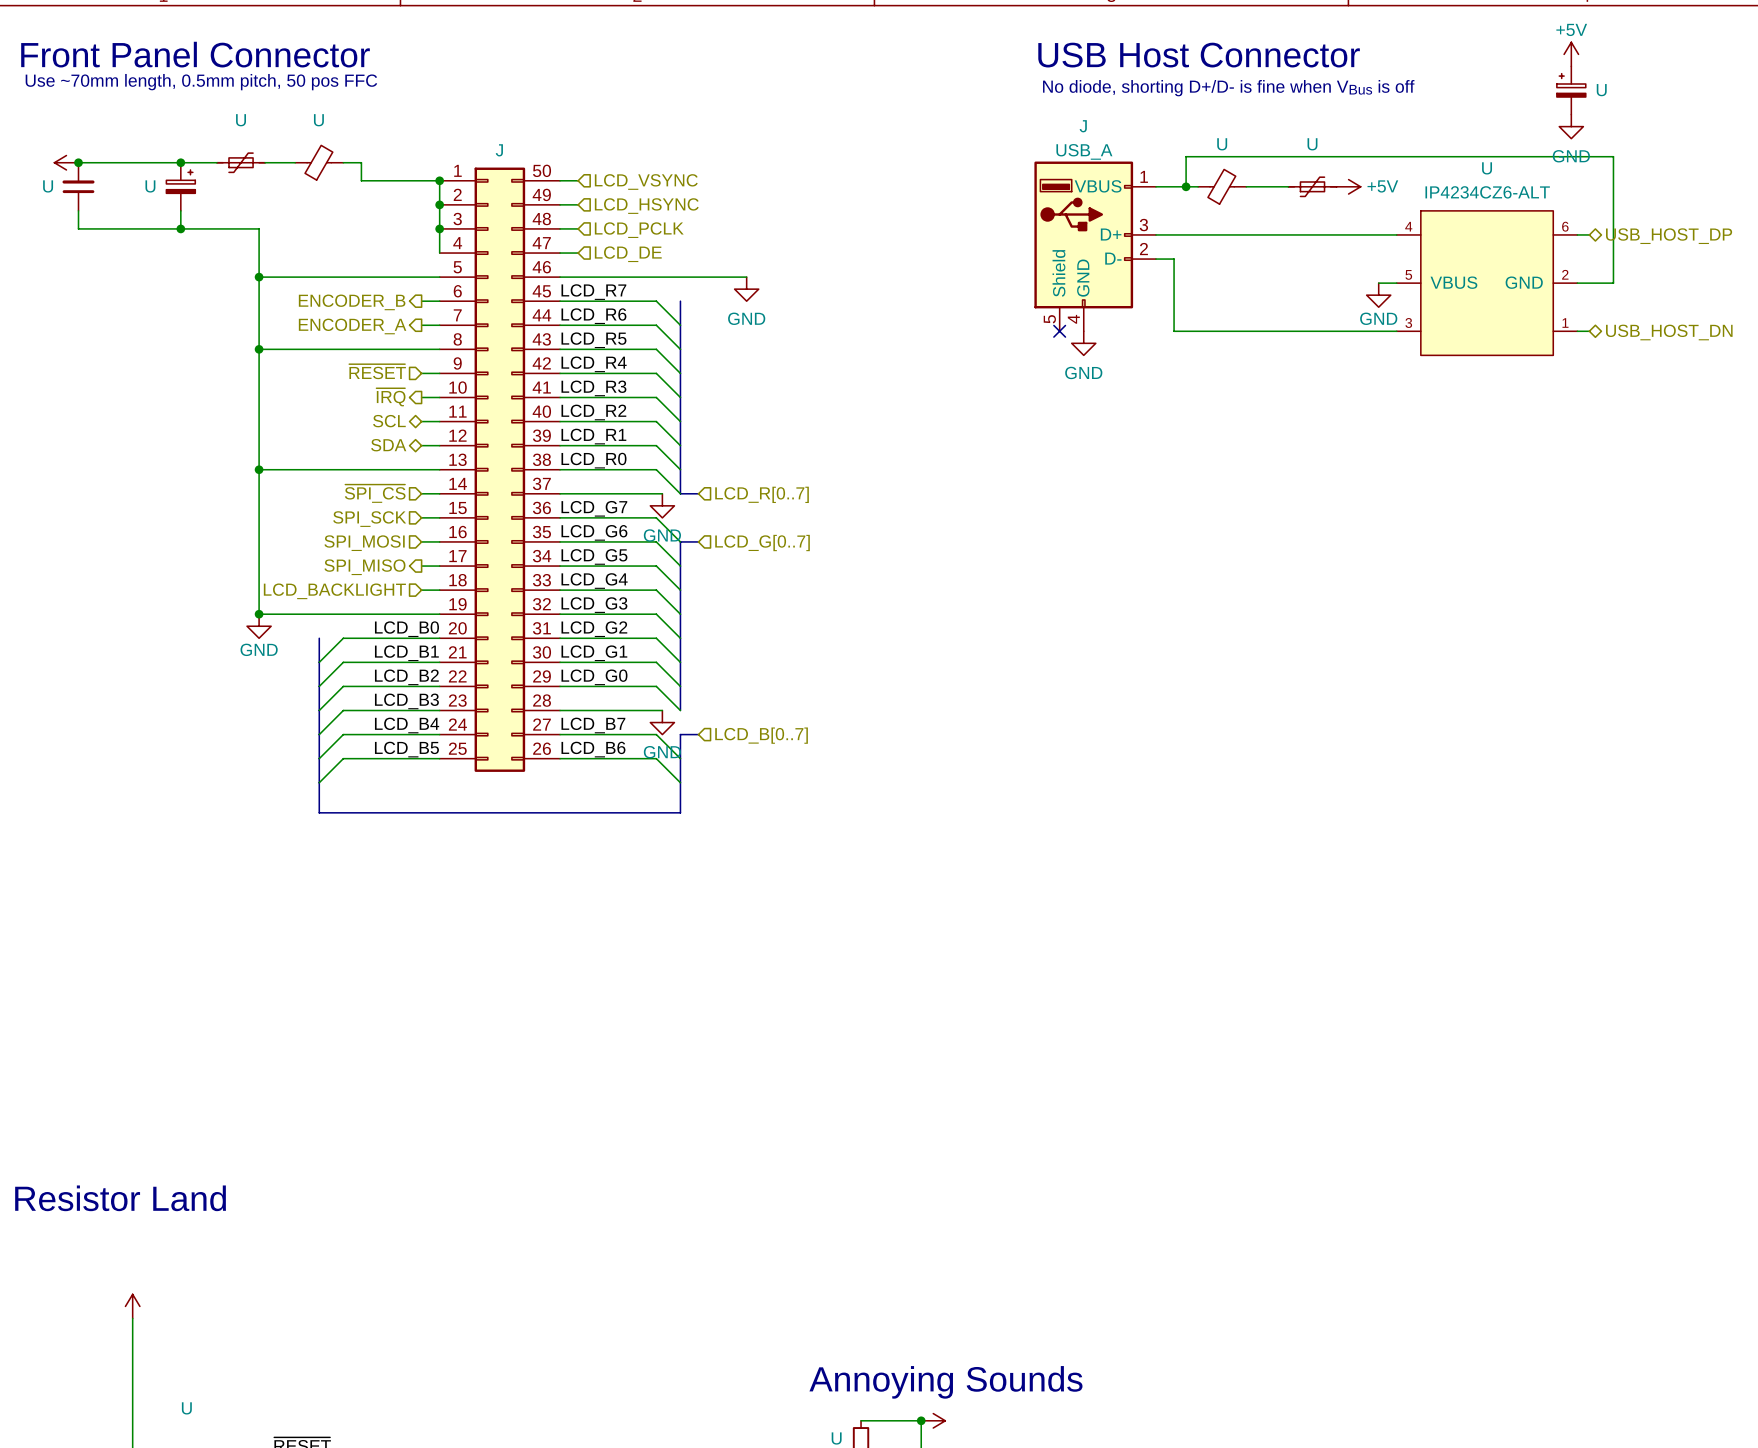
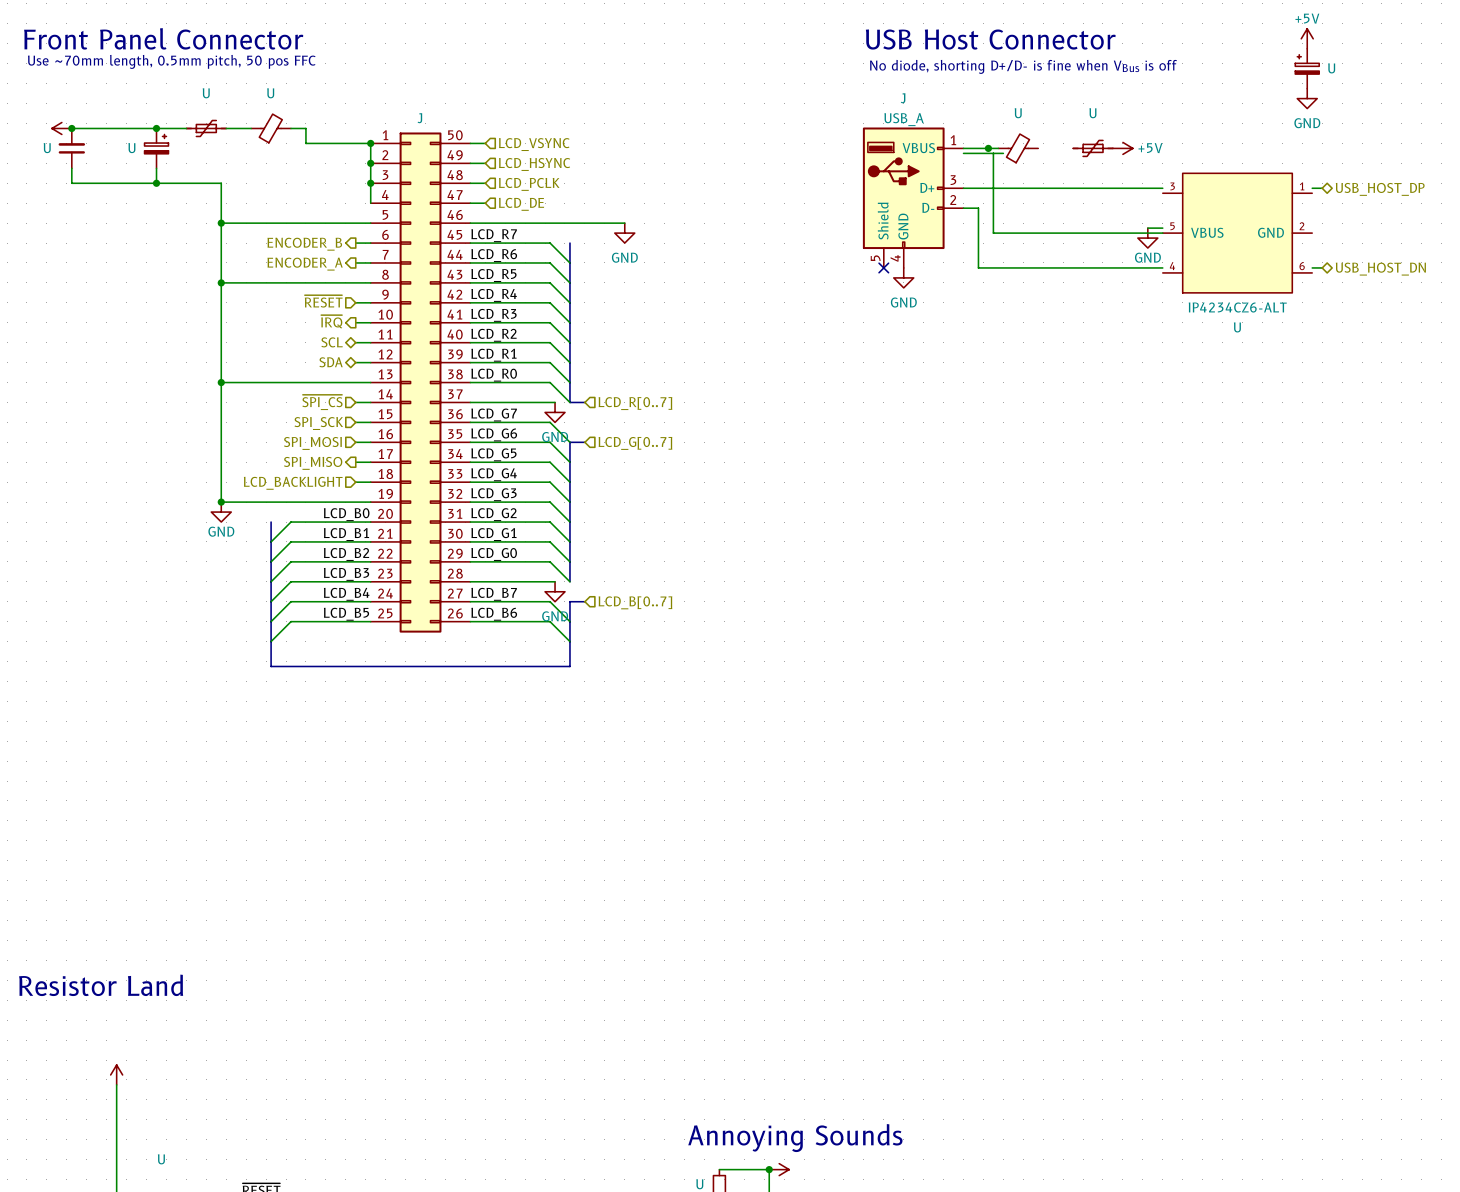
wire: (1186, 186) (1186, 156) (1613, 156) (1613, 283) (1577, 283) -> none
wire: (1246, 186) (1288, 186) -> none
wire: none -> (963, 153) (1003, 153)
wire: none -> (993, 153) (993, 233) (1162, 233)
U flip: as is (1487, 283) -> up-down (1237, 233)

